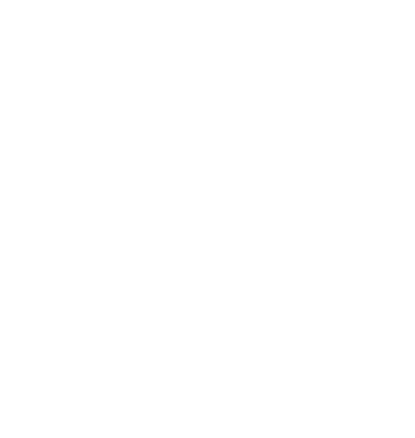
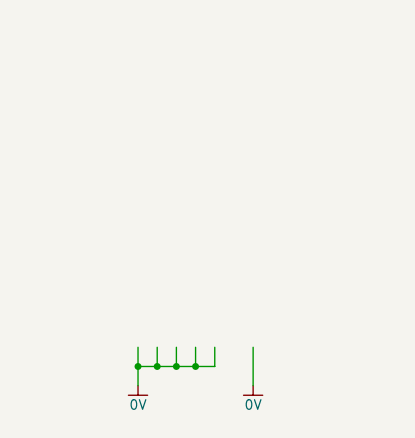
wire: none -> (138, 347) (138, 385)
wire: none -> (157, 347) (157, 366)
wire: none -> (176, 347) (176, 366)
wire: none -> (195, 347) (195, 366)
wire: none -> (214, 347) (214, 366) (138, 366)
wire: none -> (253, 347) (253, 385)
junction: none -> (138, 366)
junction: none -> (157, 366)
junction: none -> (176, 366)
junction: none -> (195, 366)
power symbol: none -> 0V (138, 390)
power symbol: none -> 0V (253, 390)

